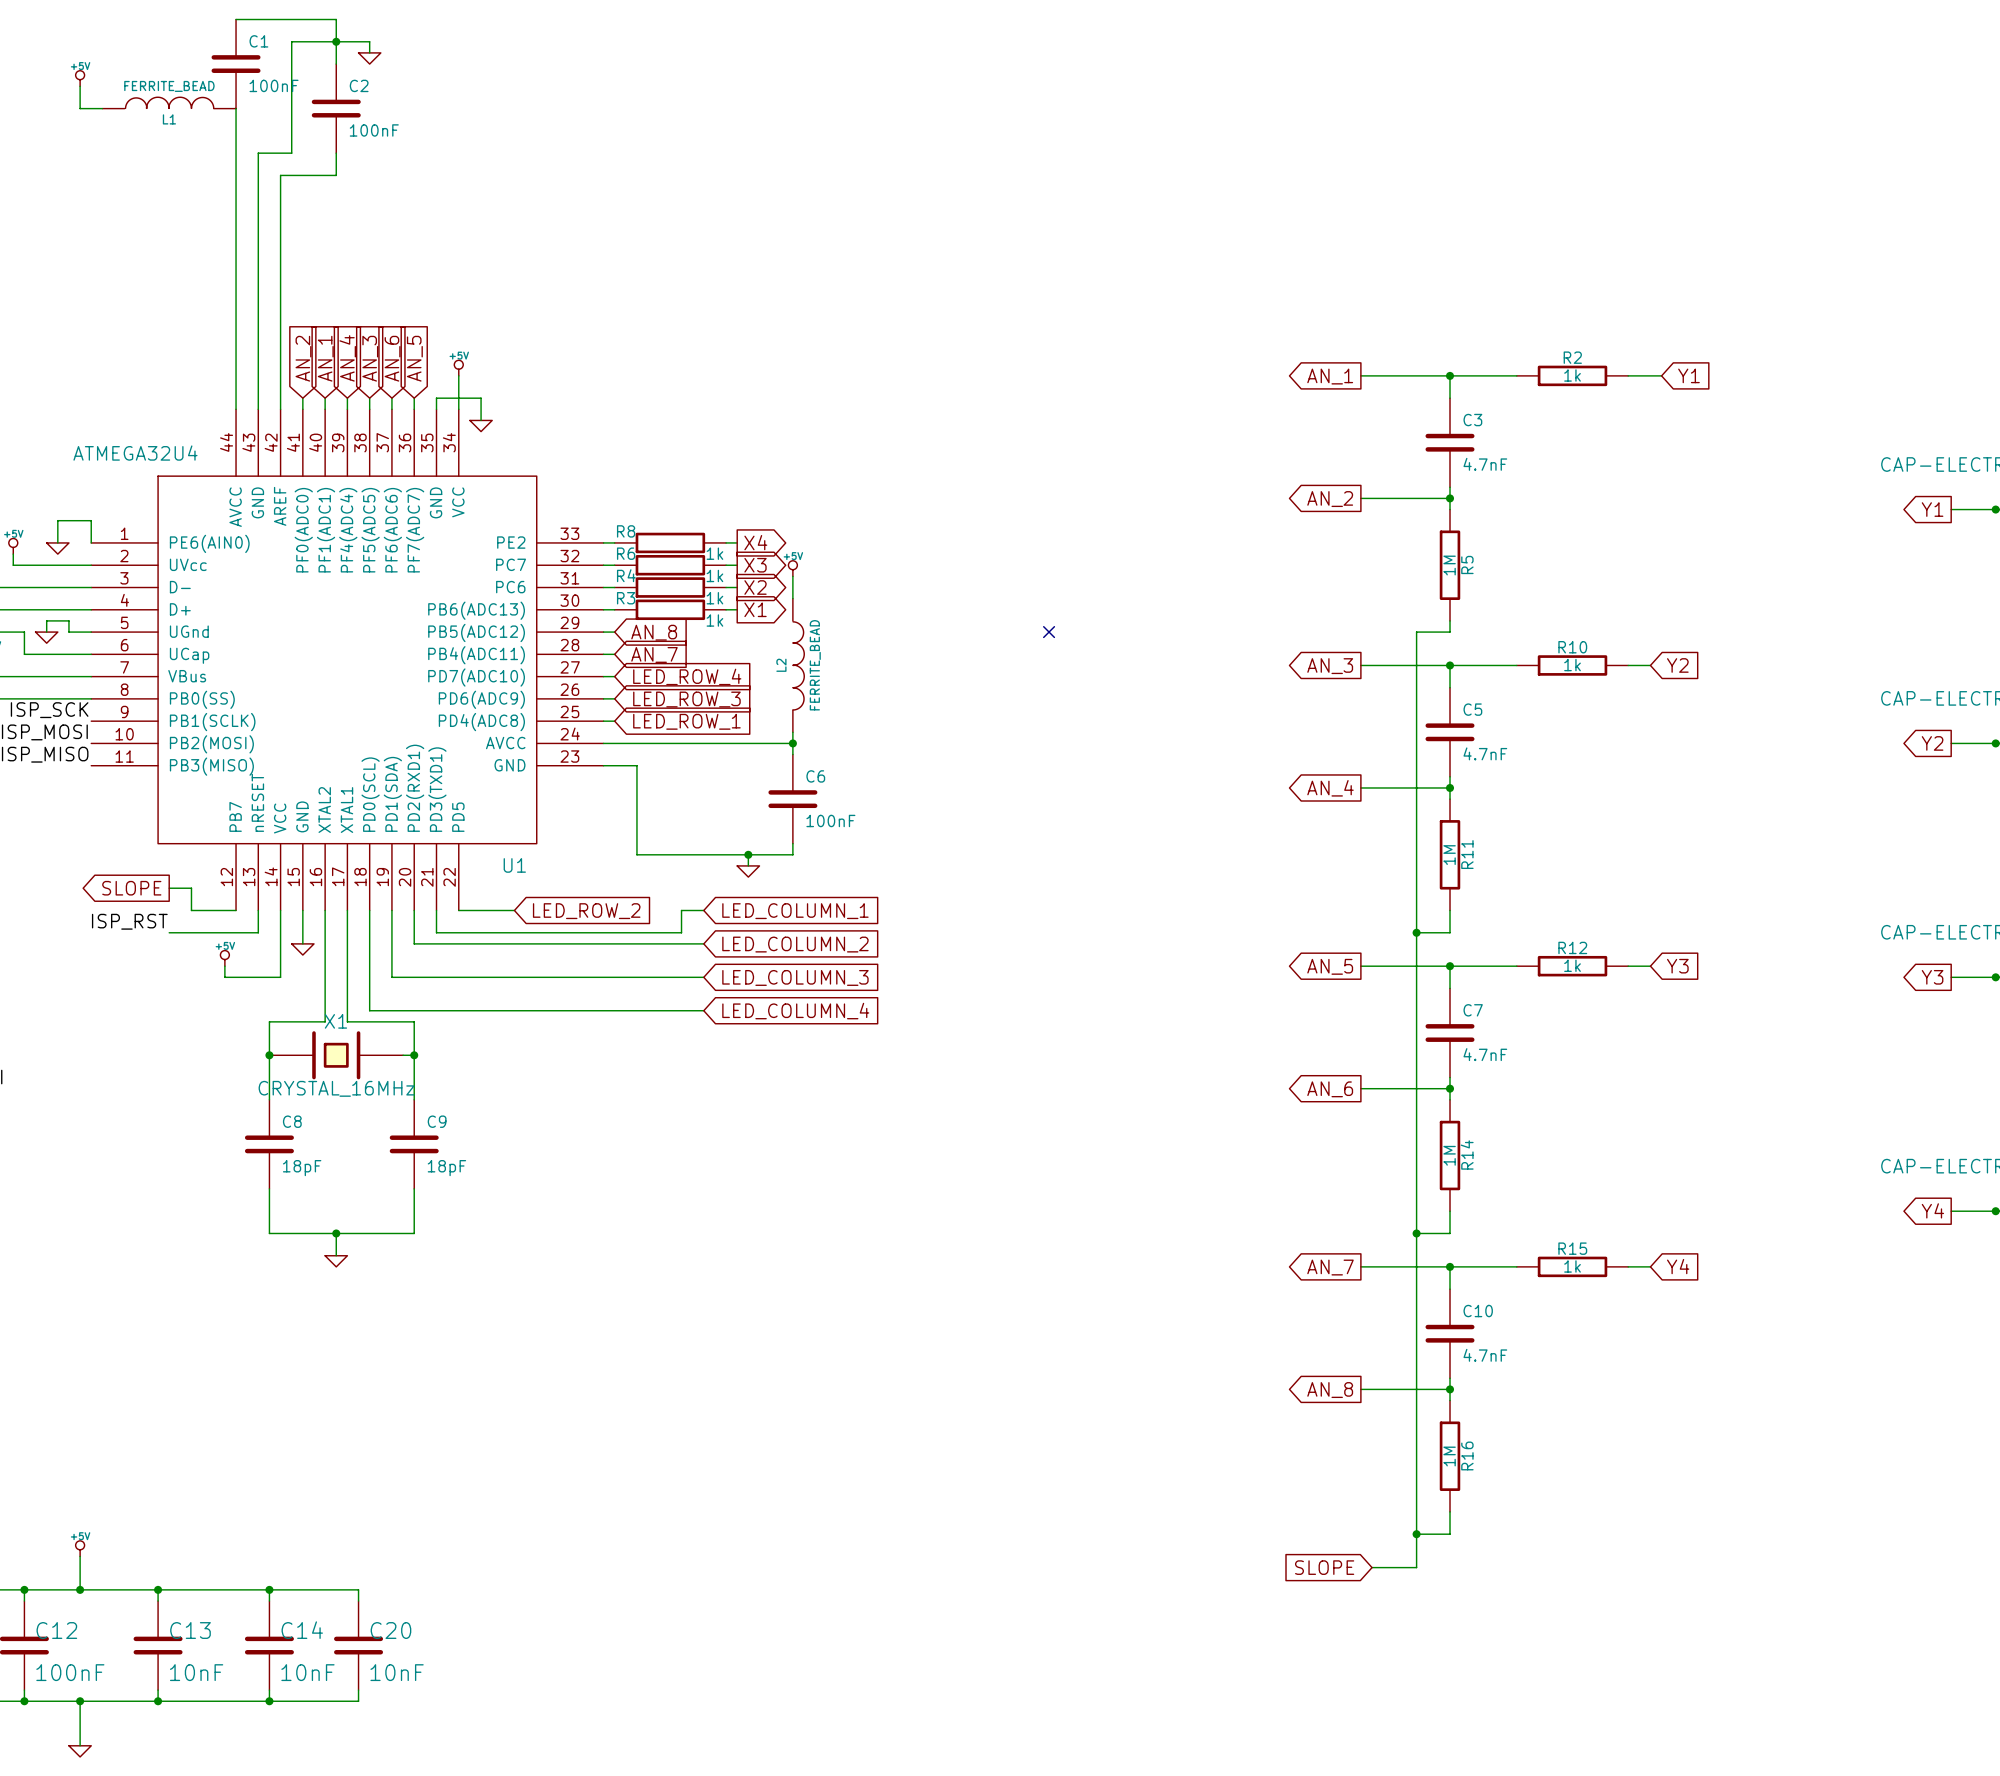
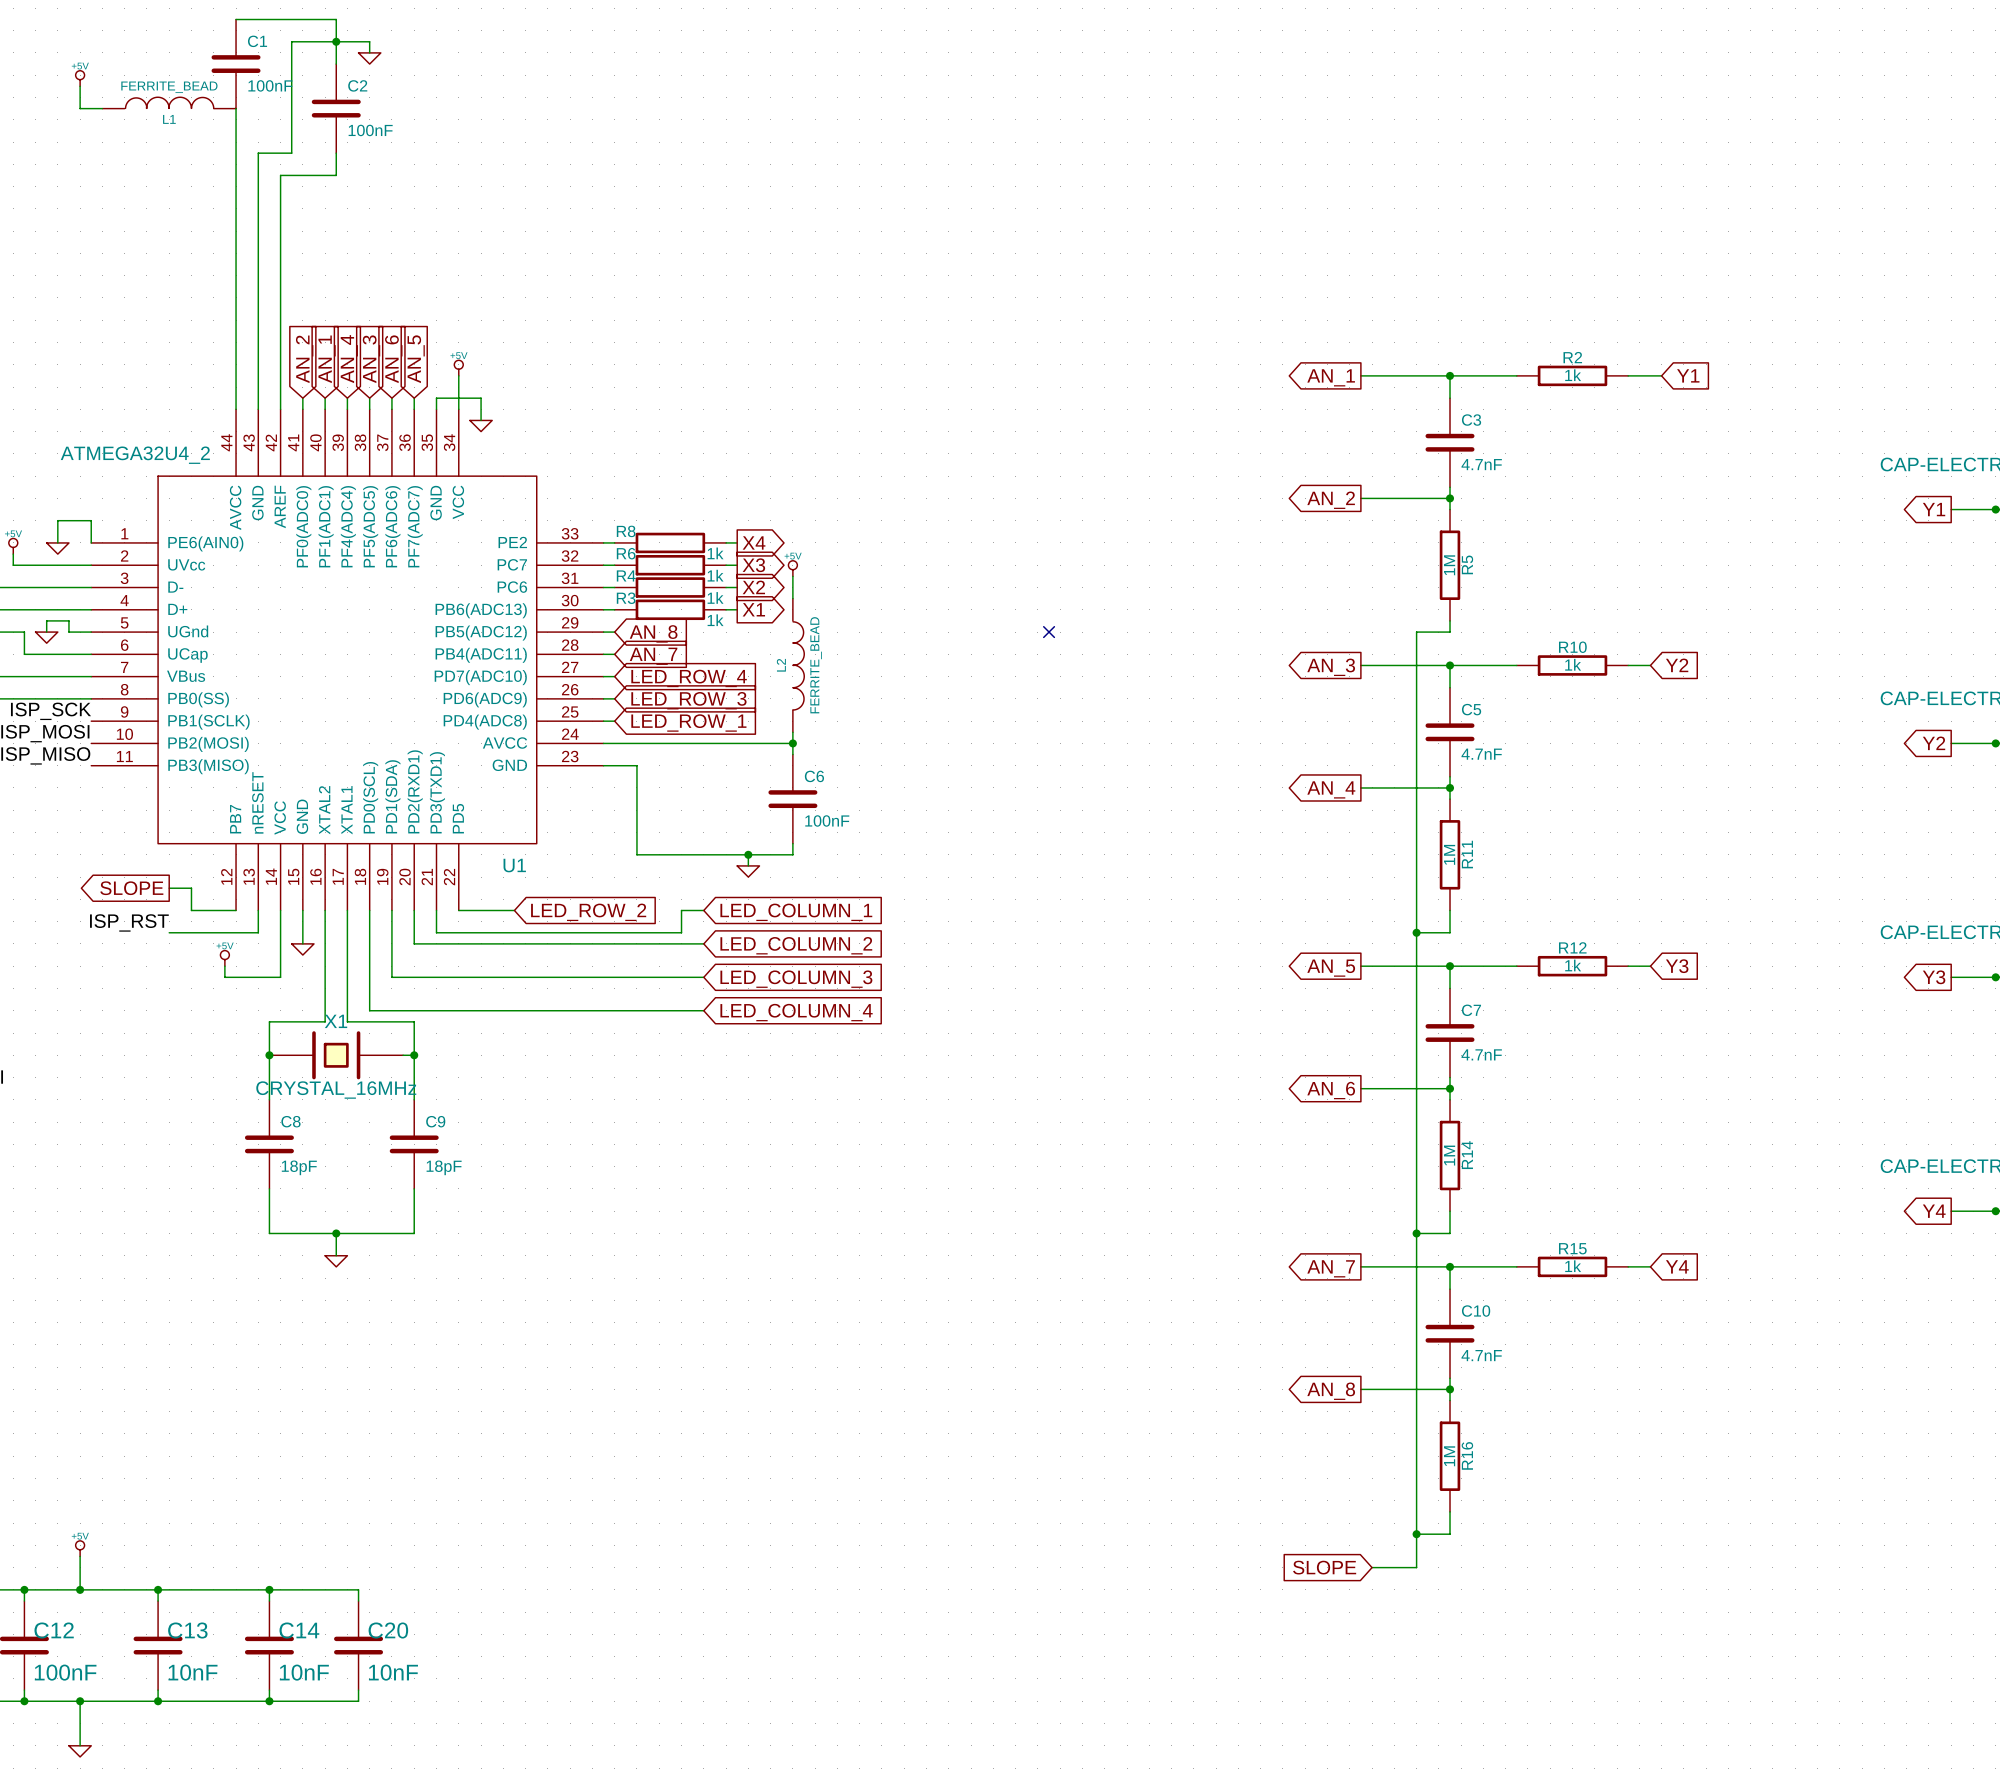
U1 value: ATMEGA32U4 (135, 453) -> ATMEGA32U4_2 (135, 455)

